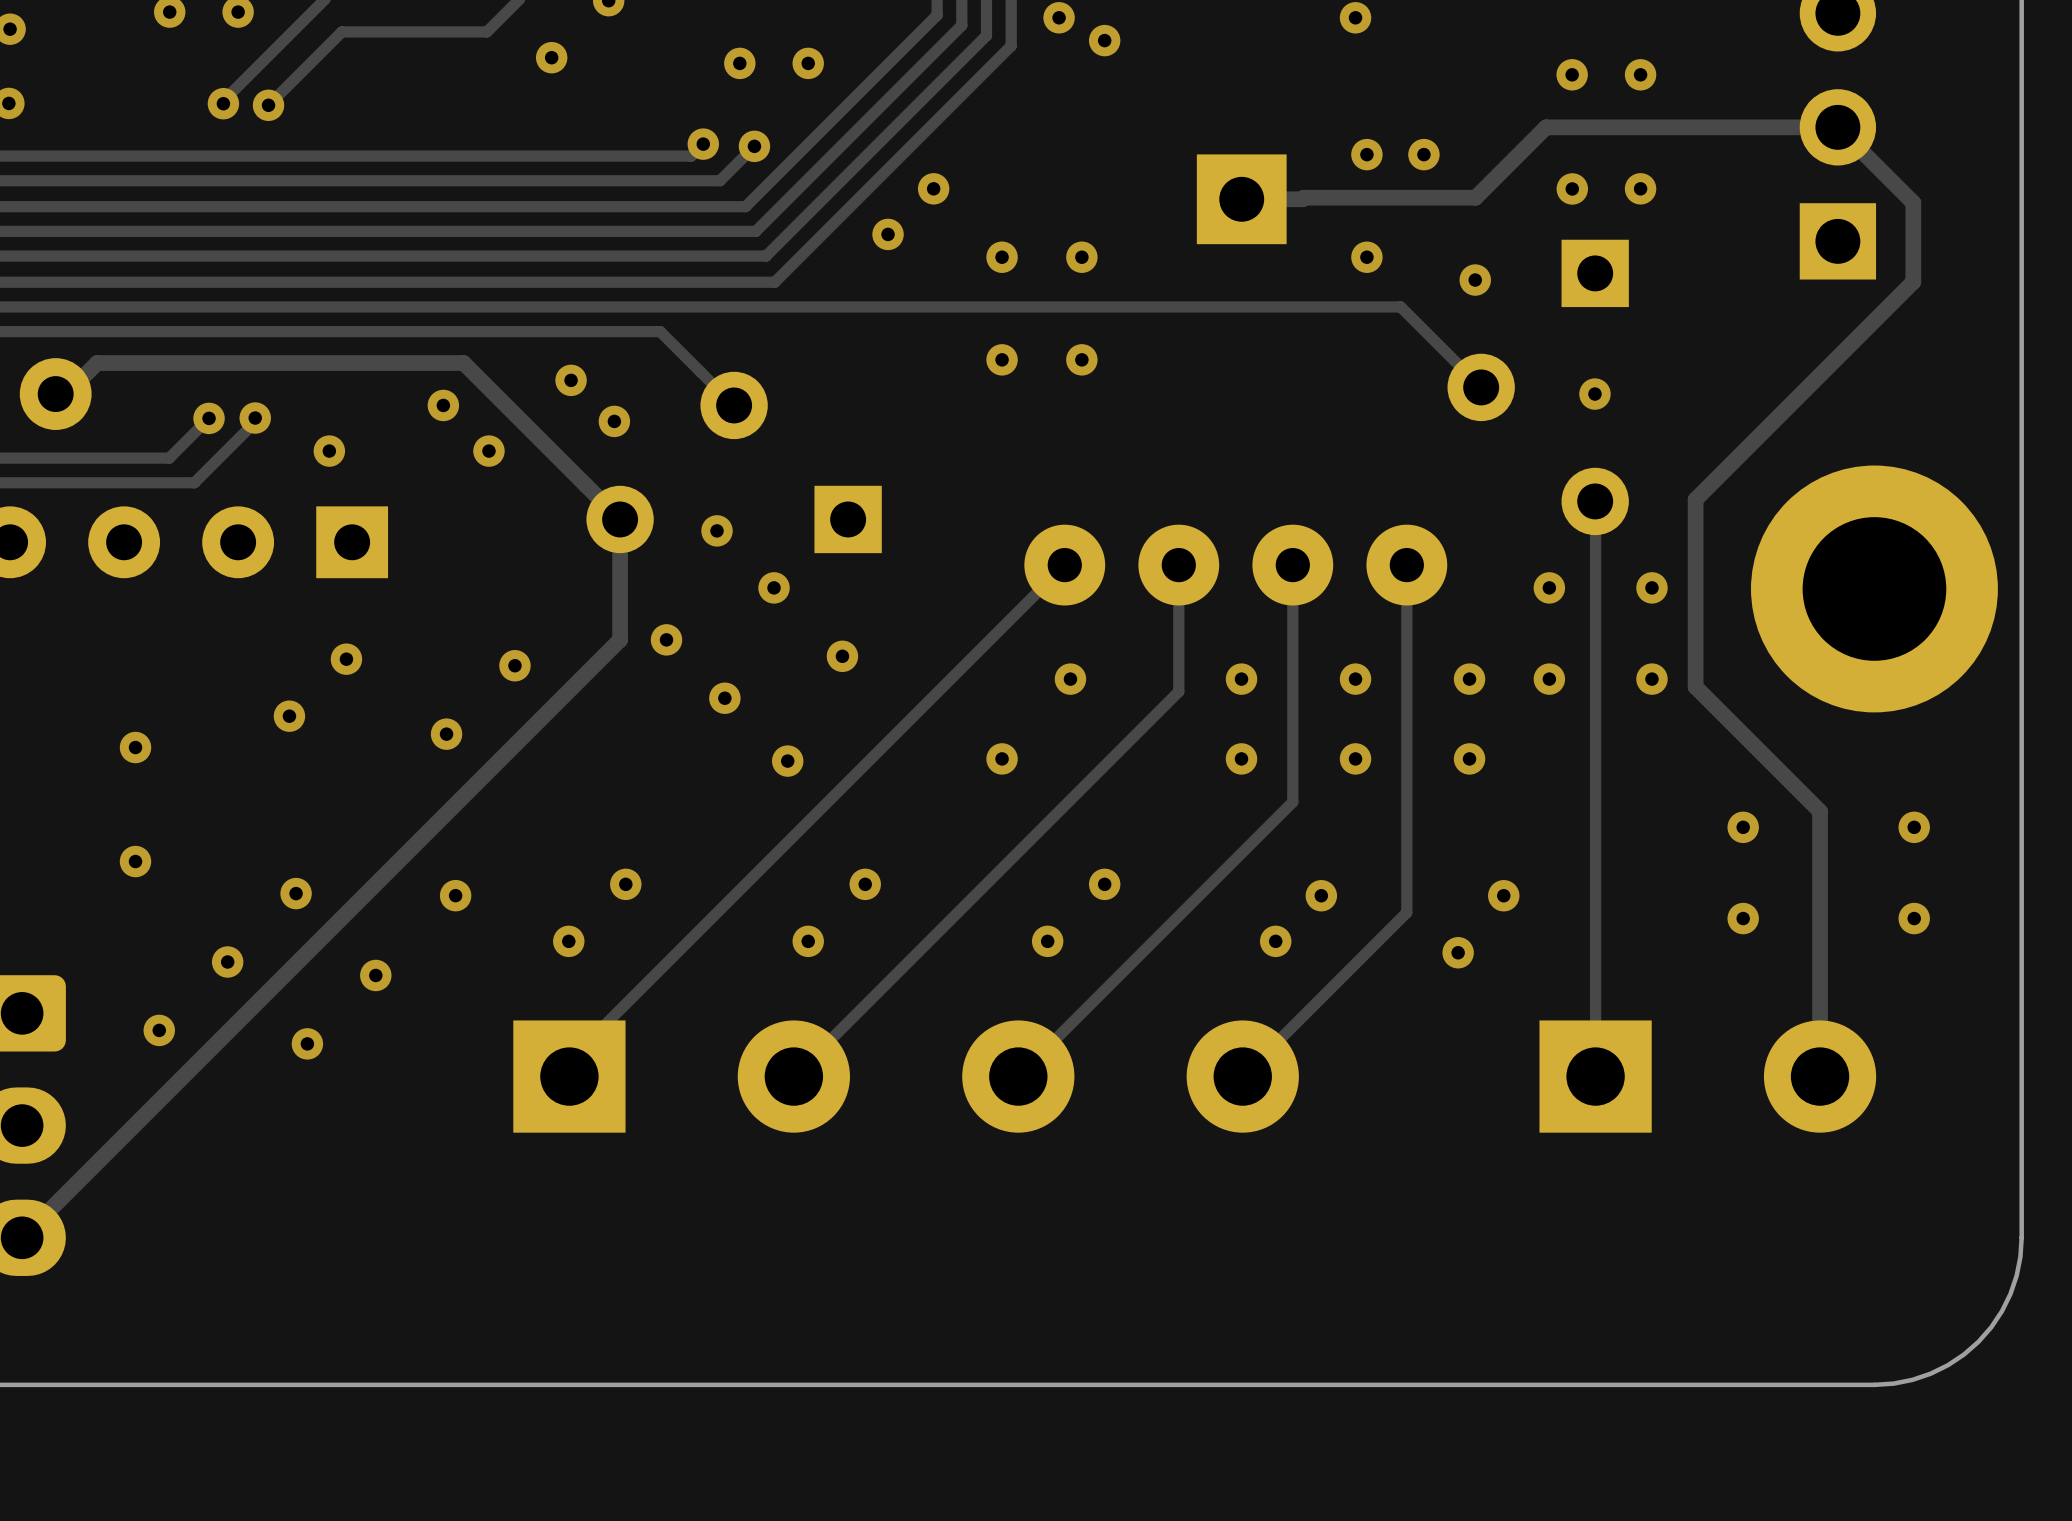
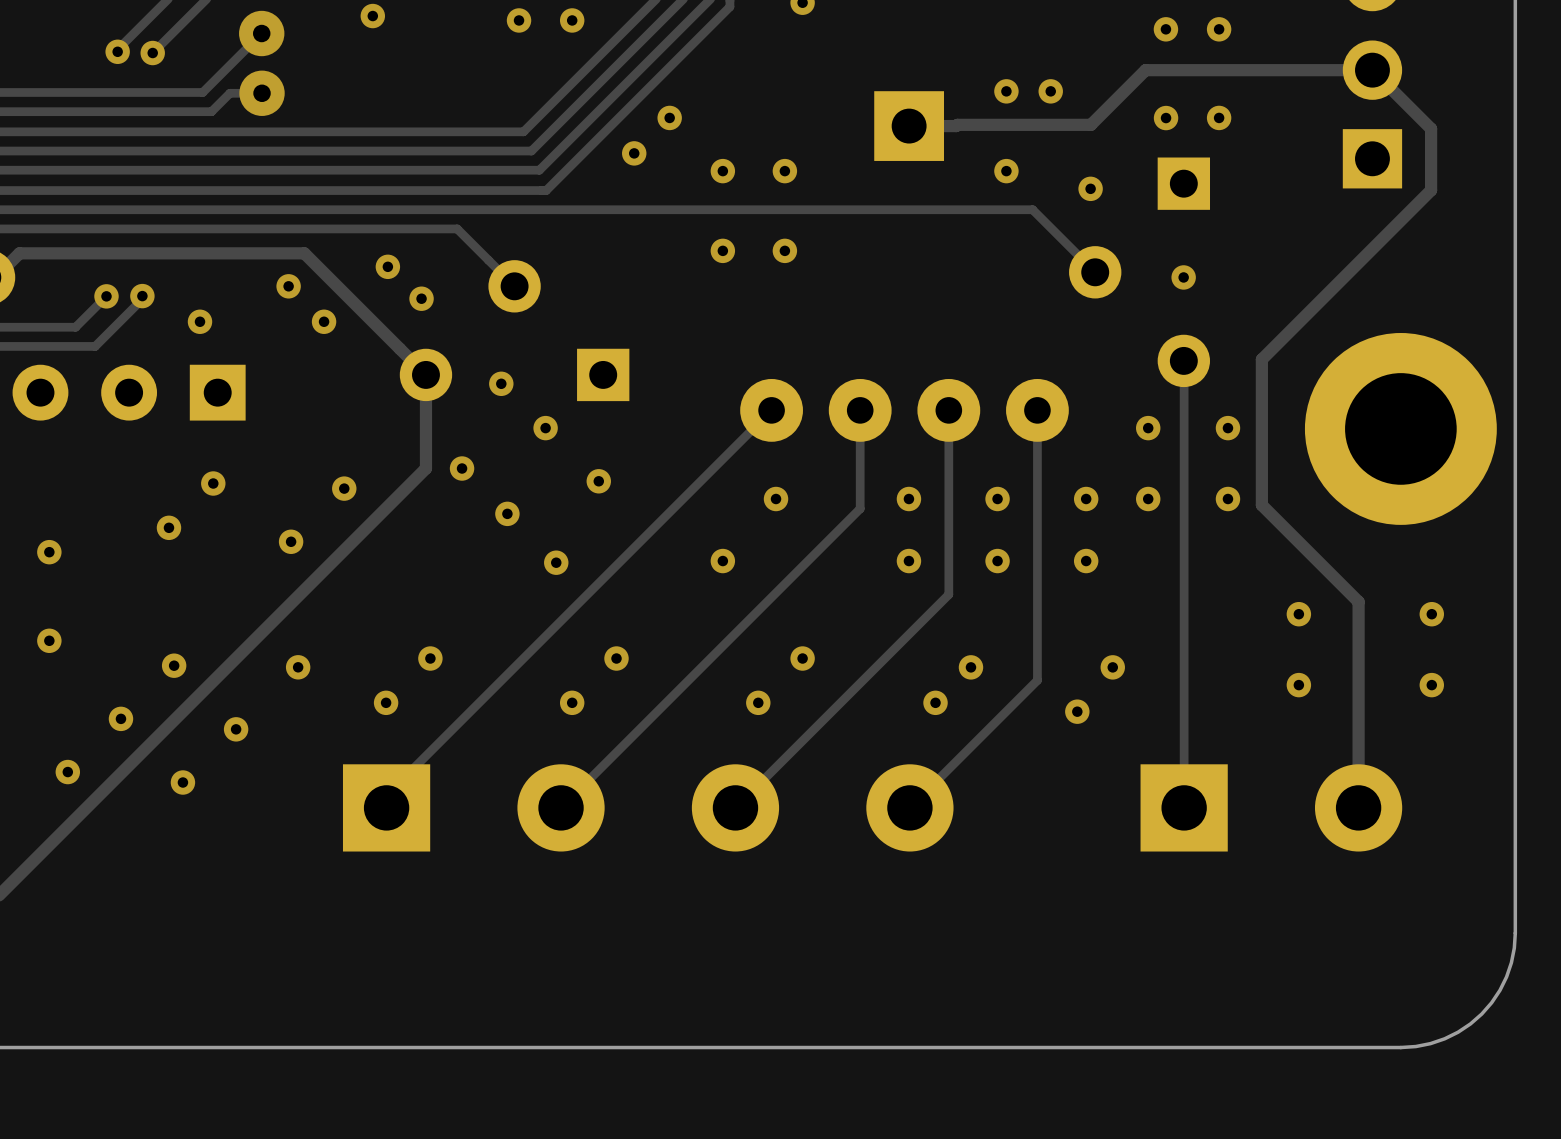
via: none -> (261, 33)
track: (703, 144) (691, 156) (332, 156) -> (261, 33) (202, 92)
via: (703, 144) -> none
track: (754, 146) (720, 180) (344, 180) -> (262, 93) (229, 93) (211, 111)
via: (754, 146) -> none
via: none -> (262, 93)

